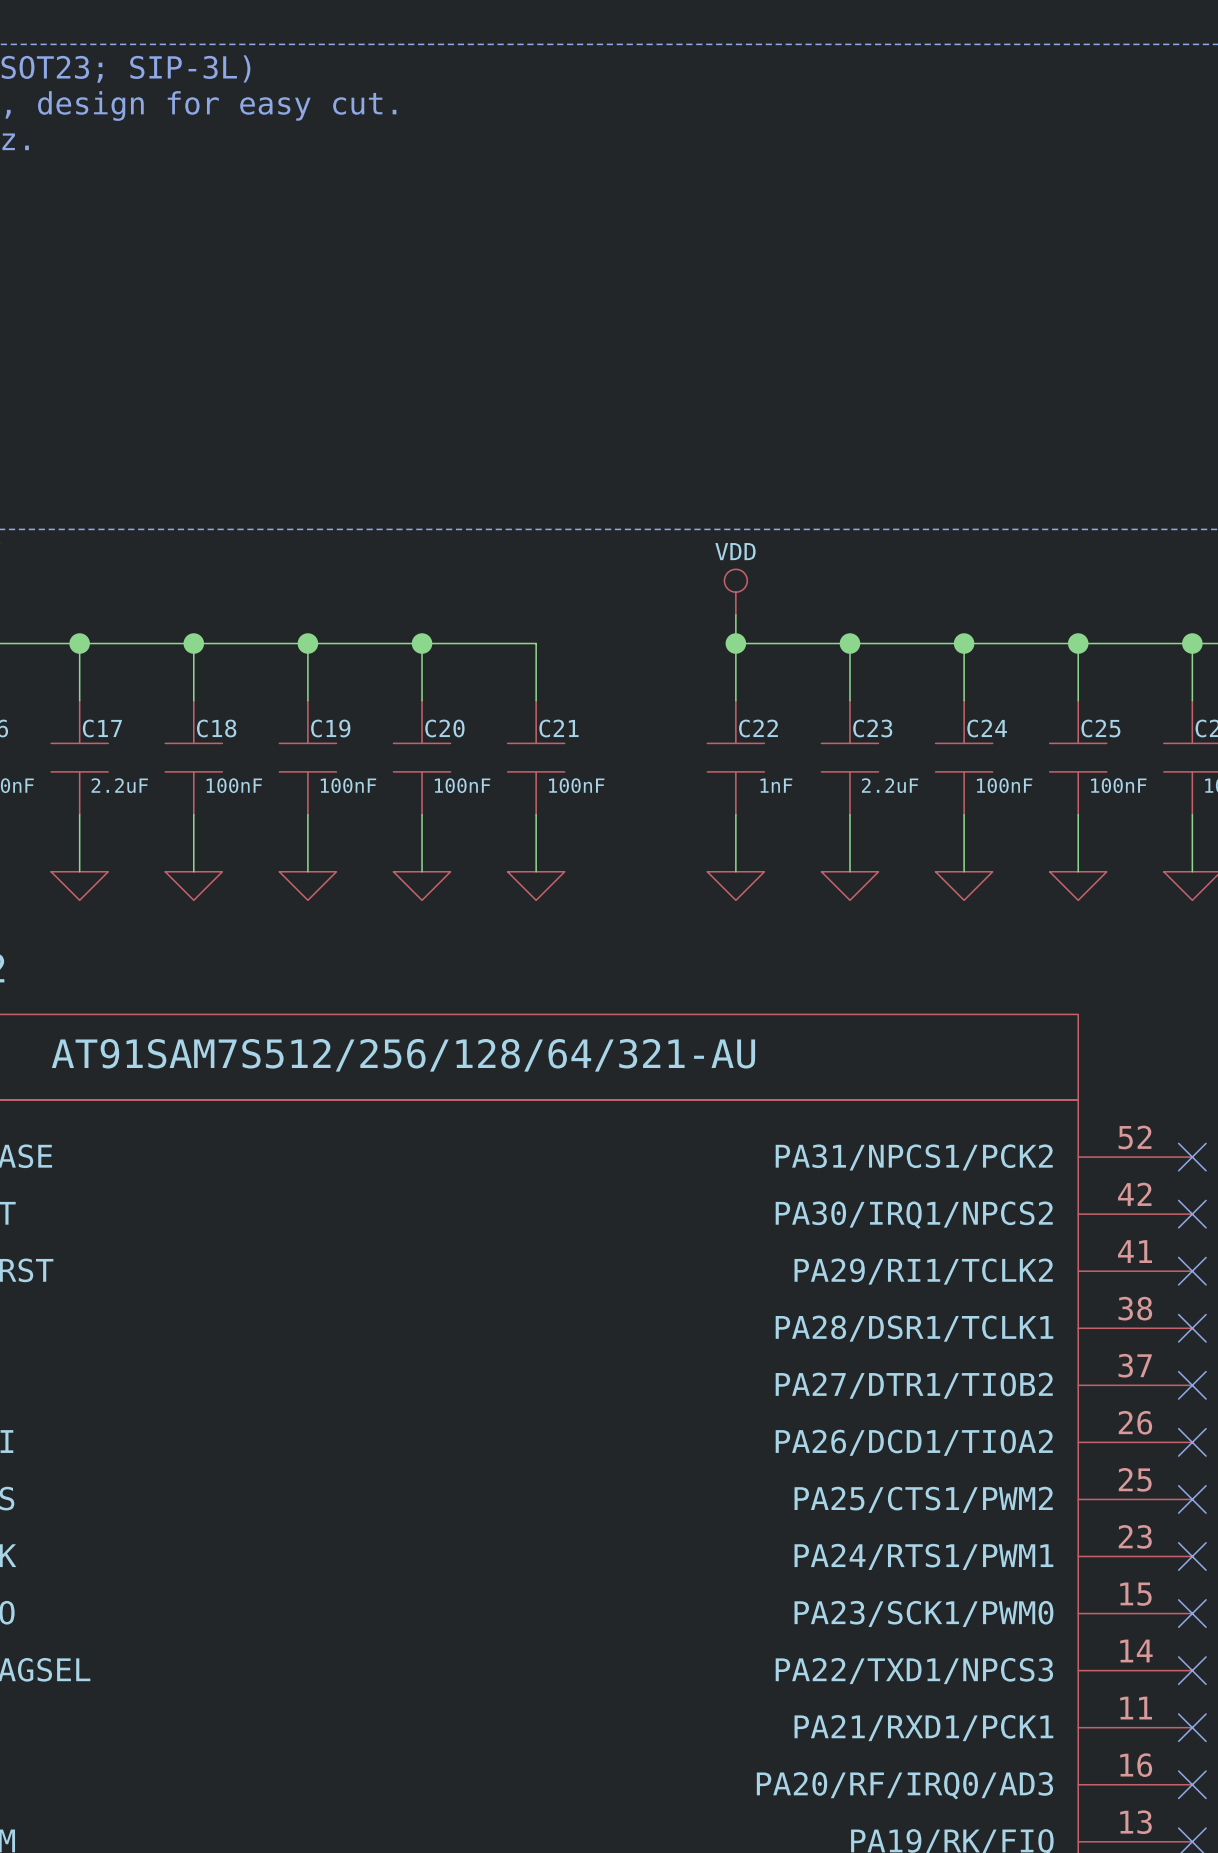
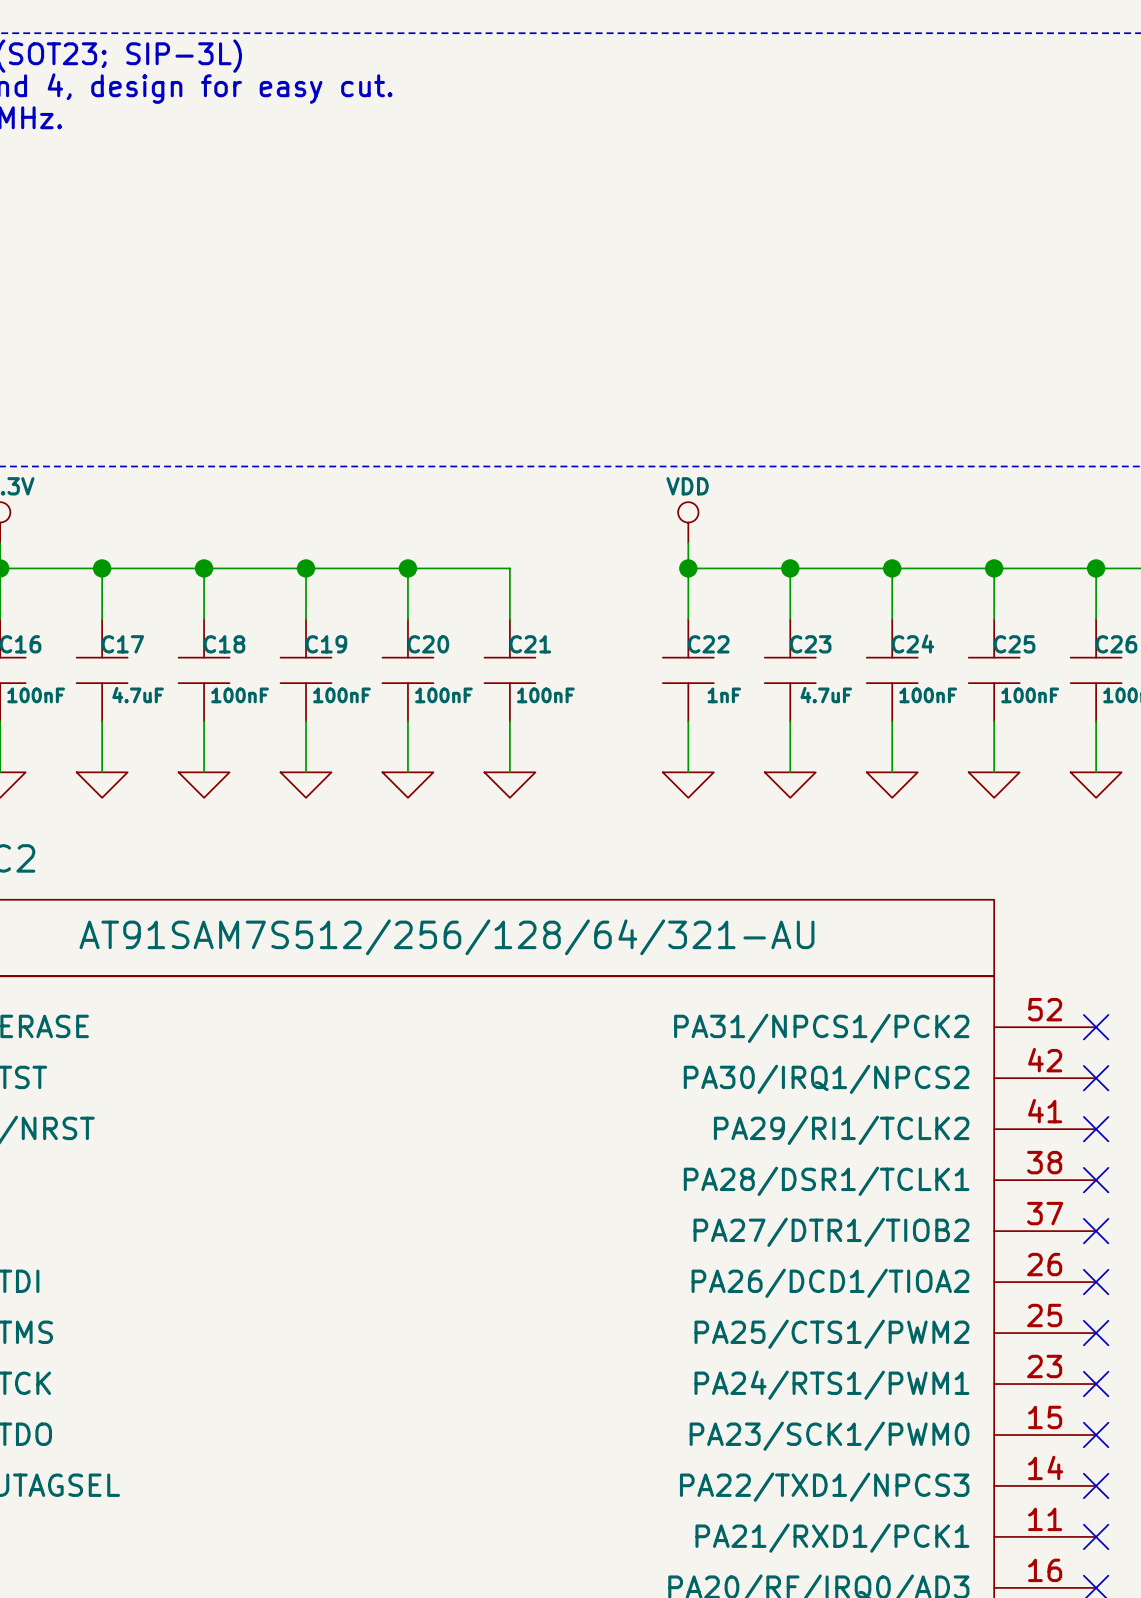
C17 value: 2.2uF (119, 785) -> 4.7uF (138, 695)
C23 value: 2.2uF (890, 785) -> 4.7uF (826, 695)

